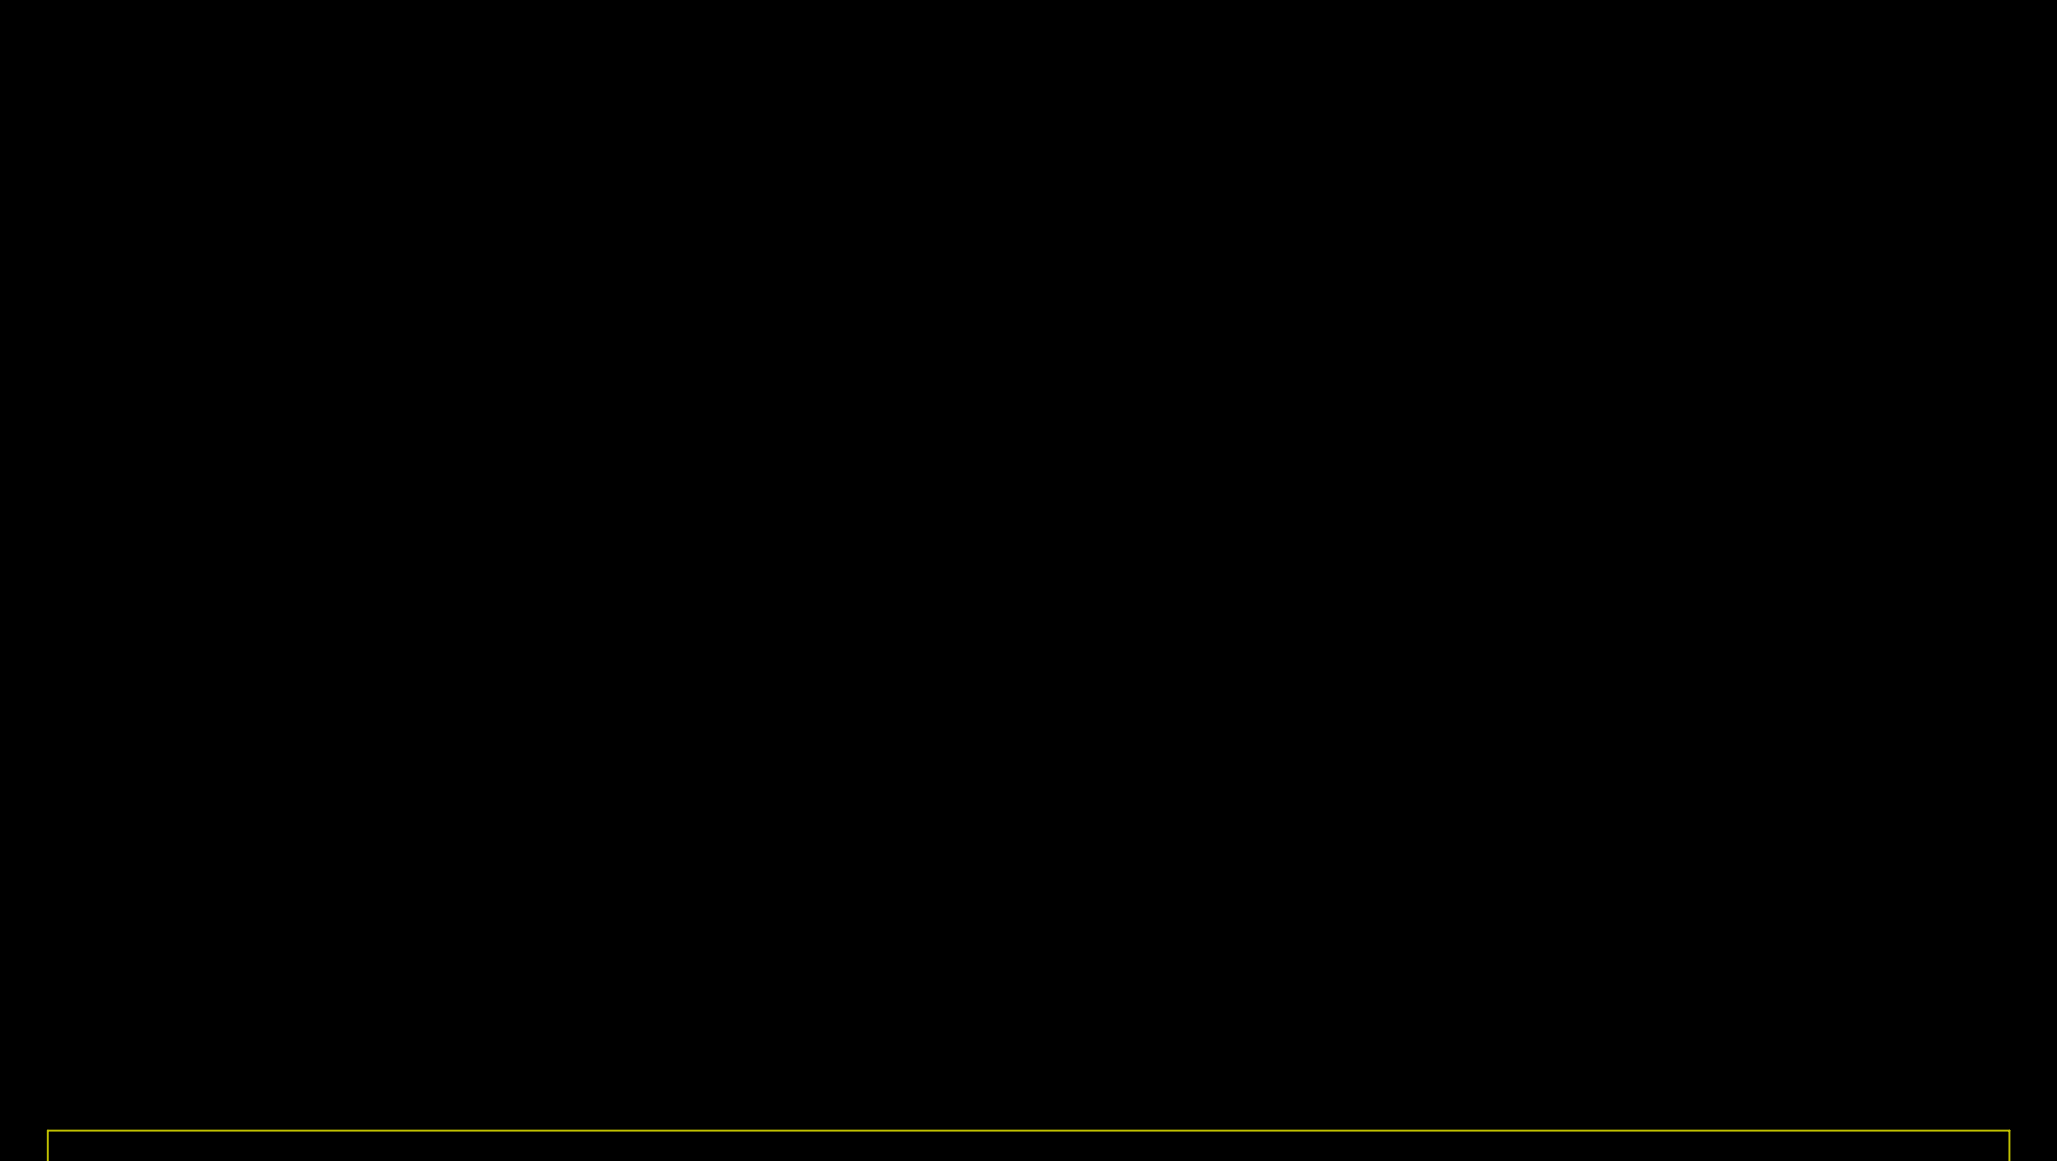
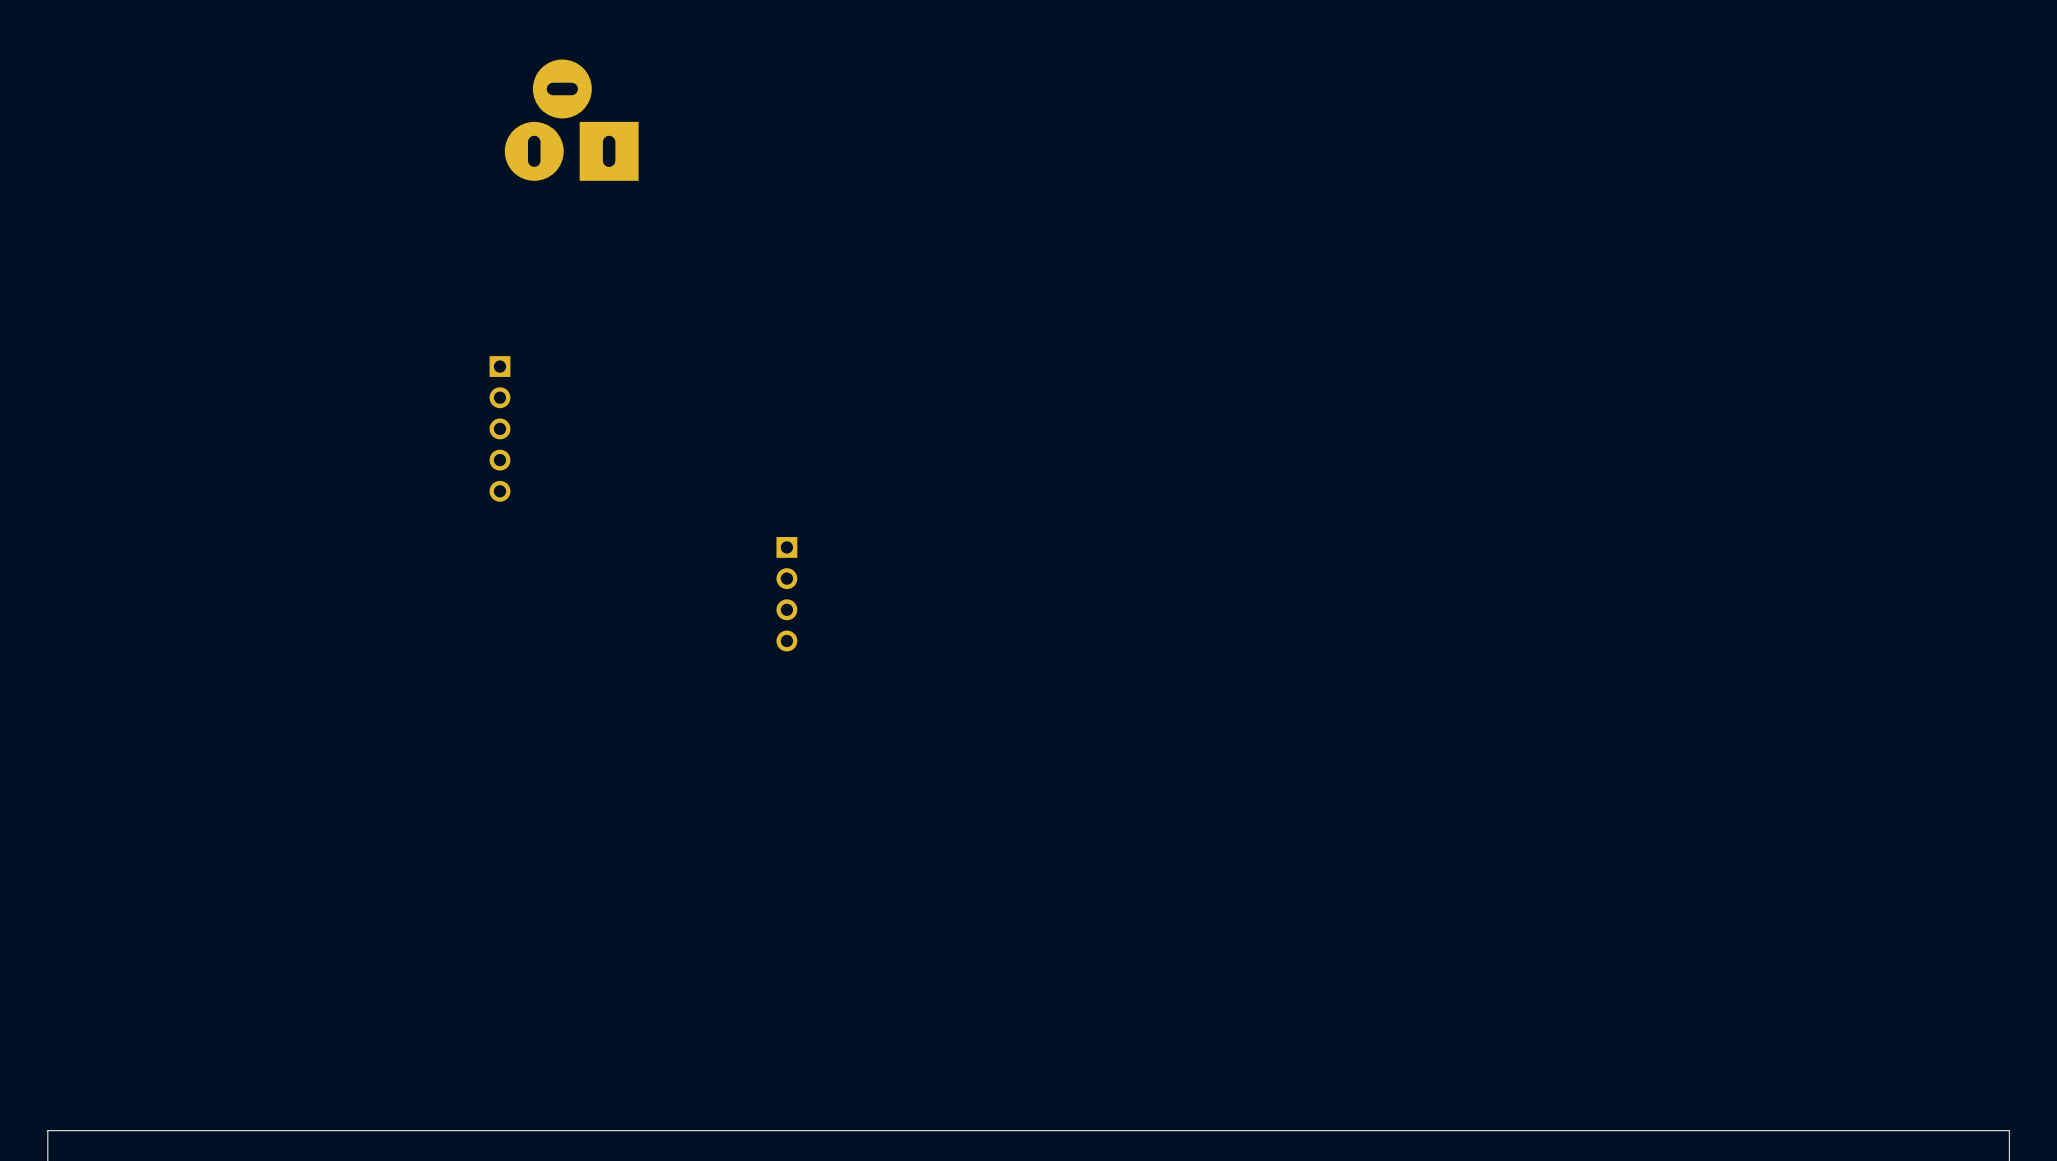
part: none -> (571, 120)
part: none -> (499, 428)
part: none -> (786, 594)

